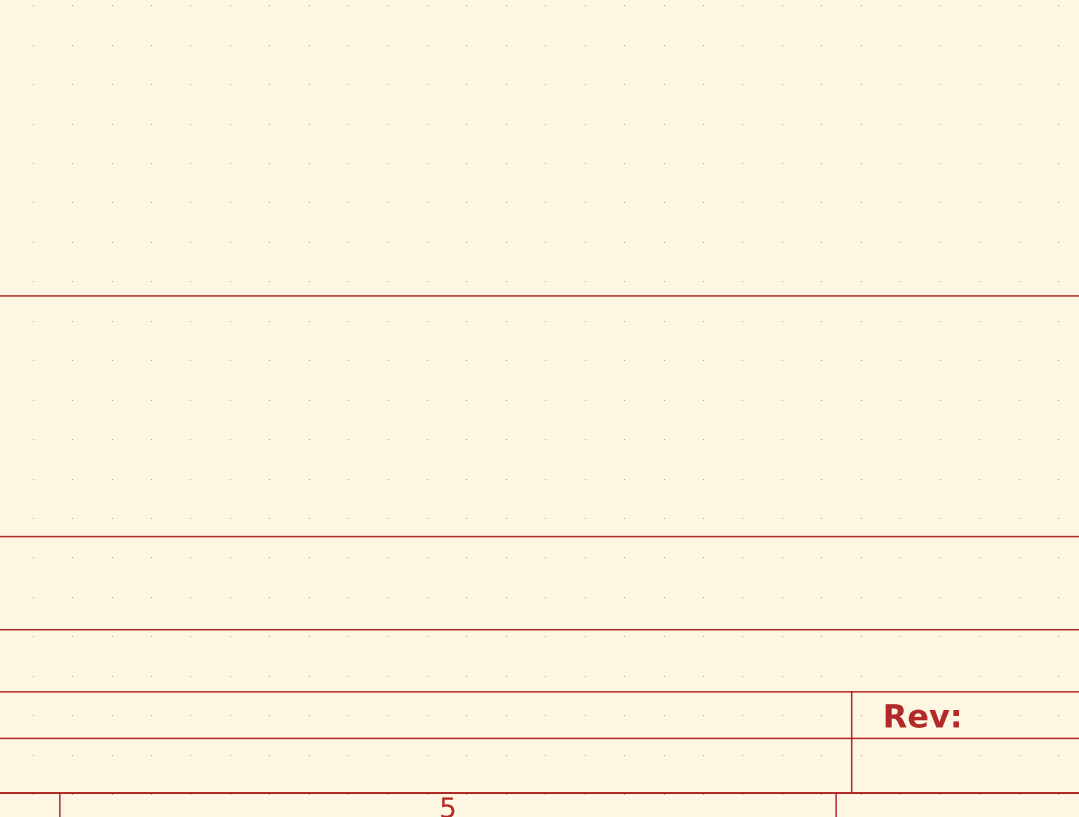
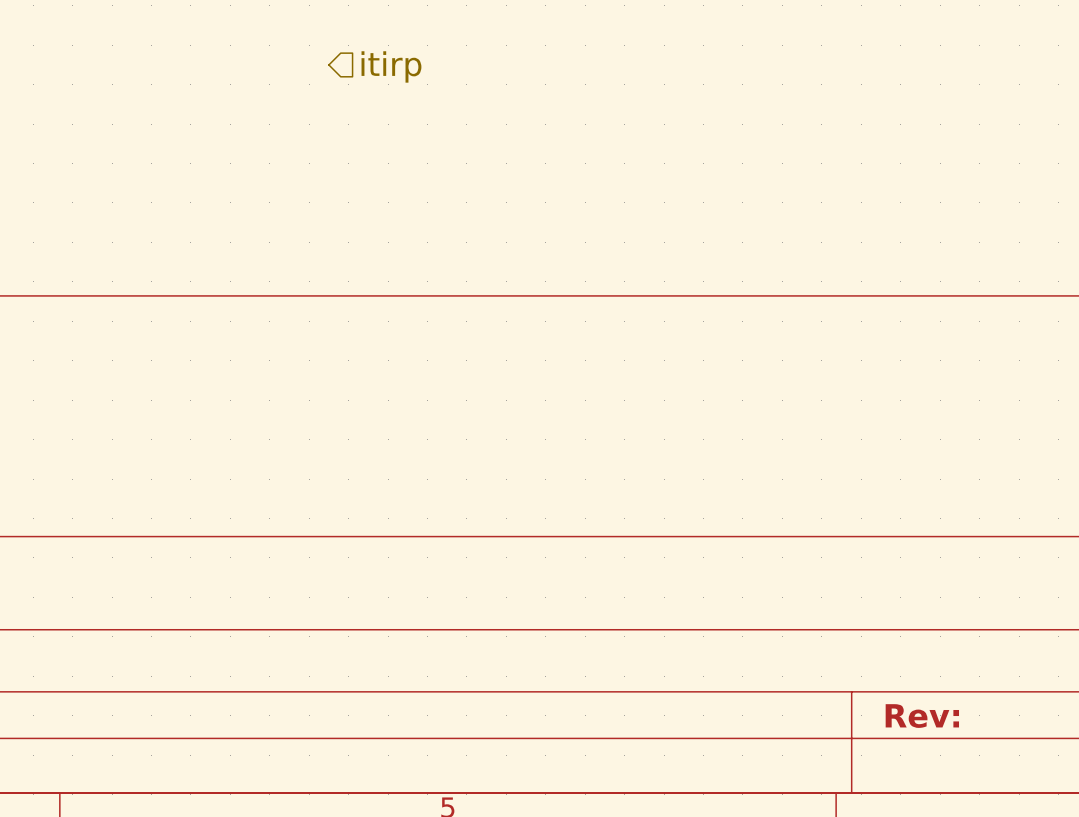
hierarchical label: none -> itirp (391, 66)

